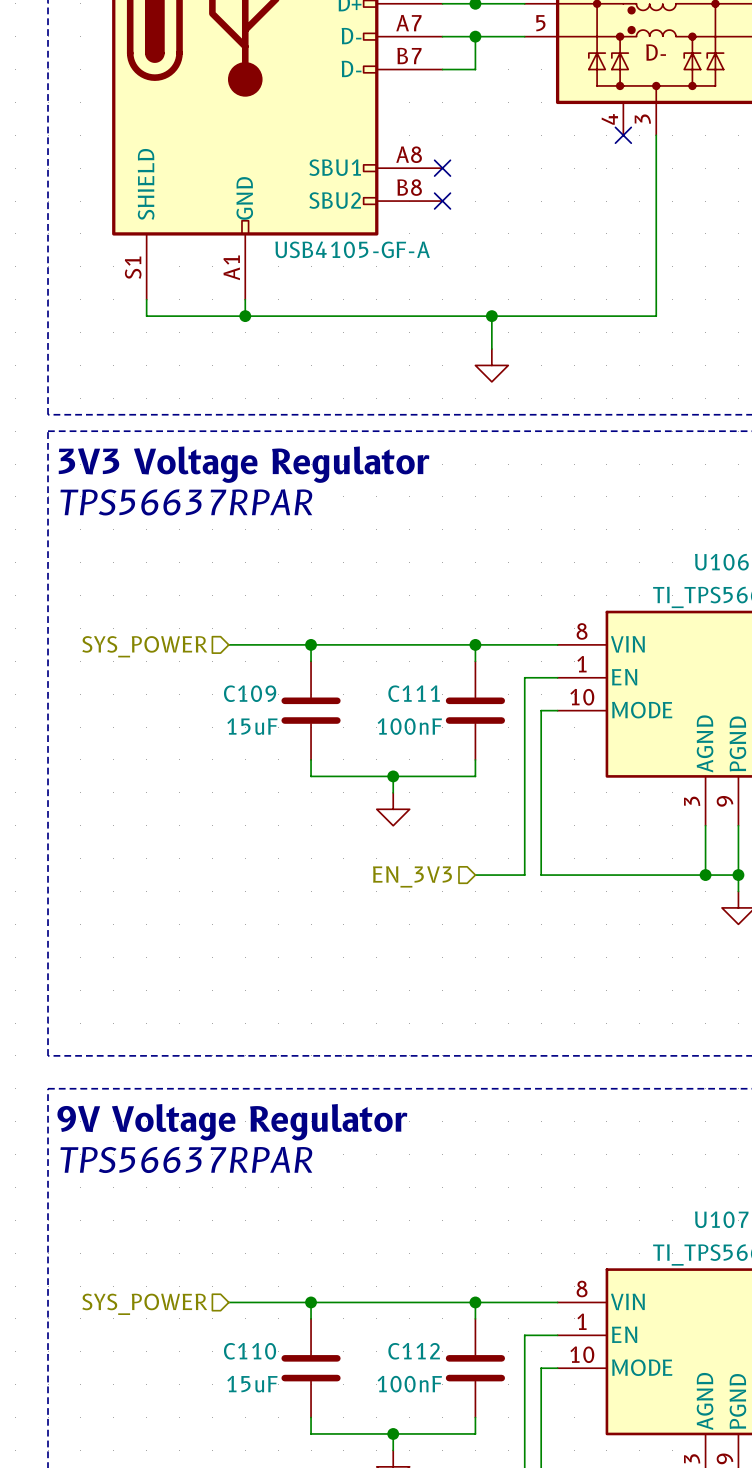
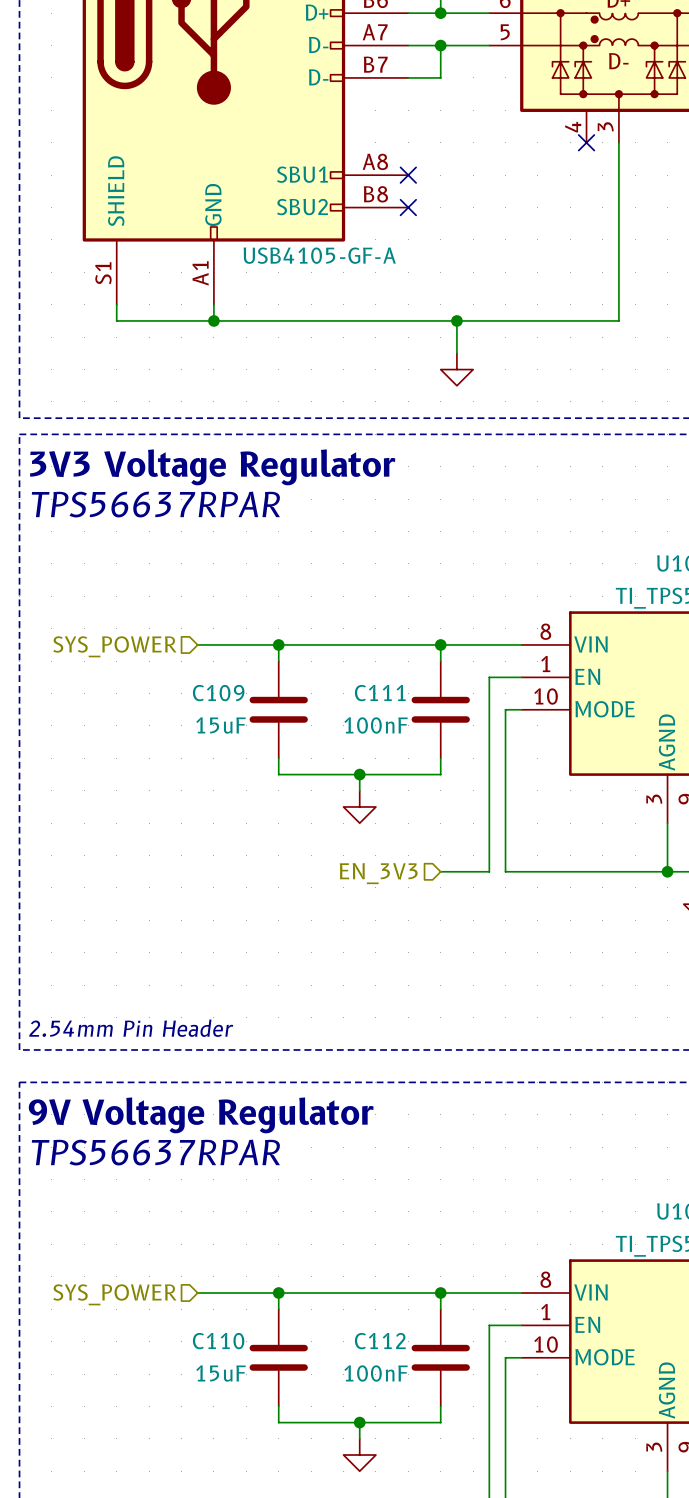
text: none -> 2.54mm Pin Header (131, 1028)

